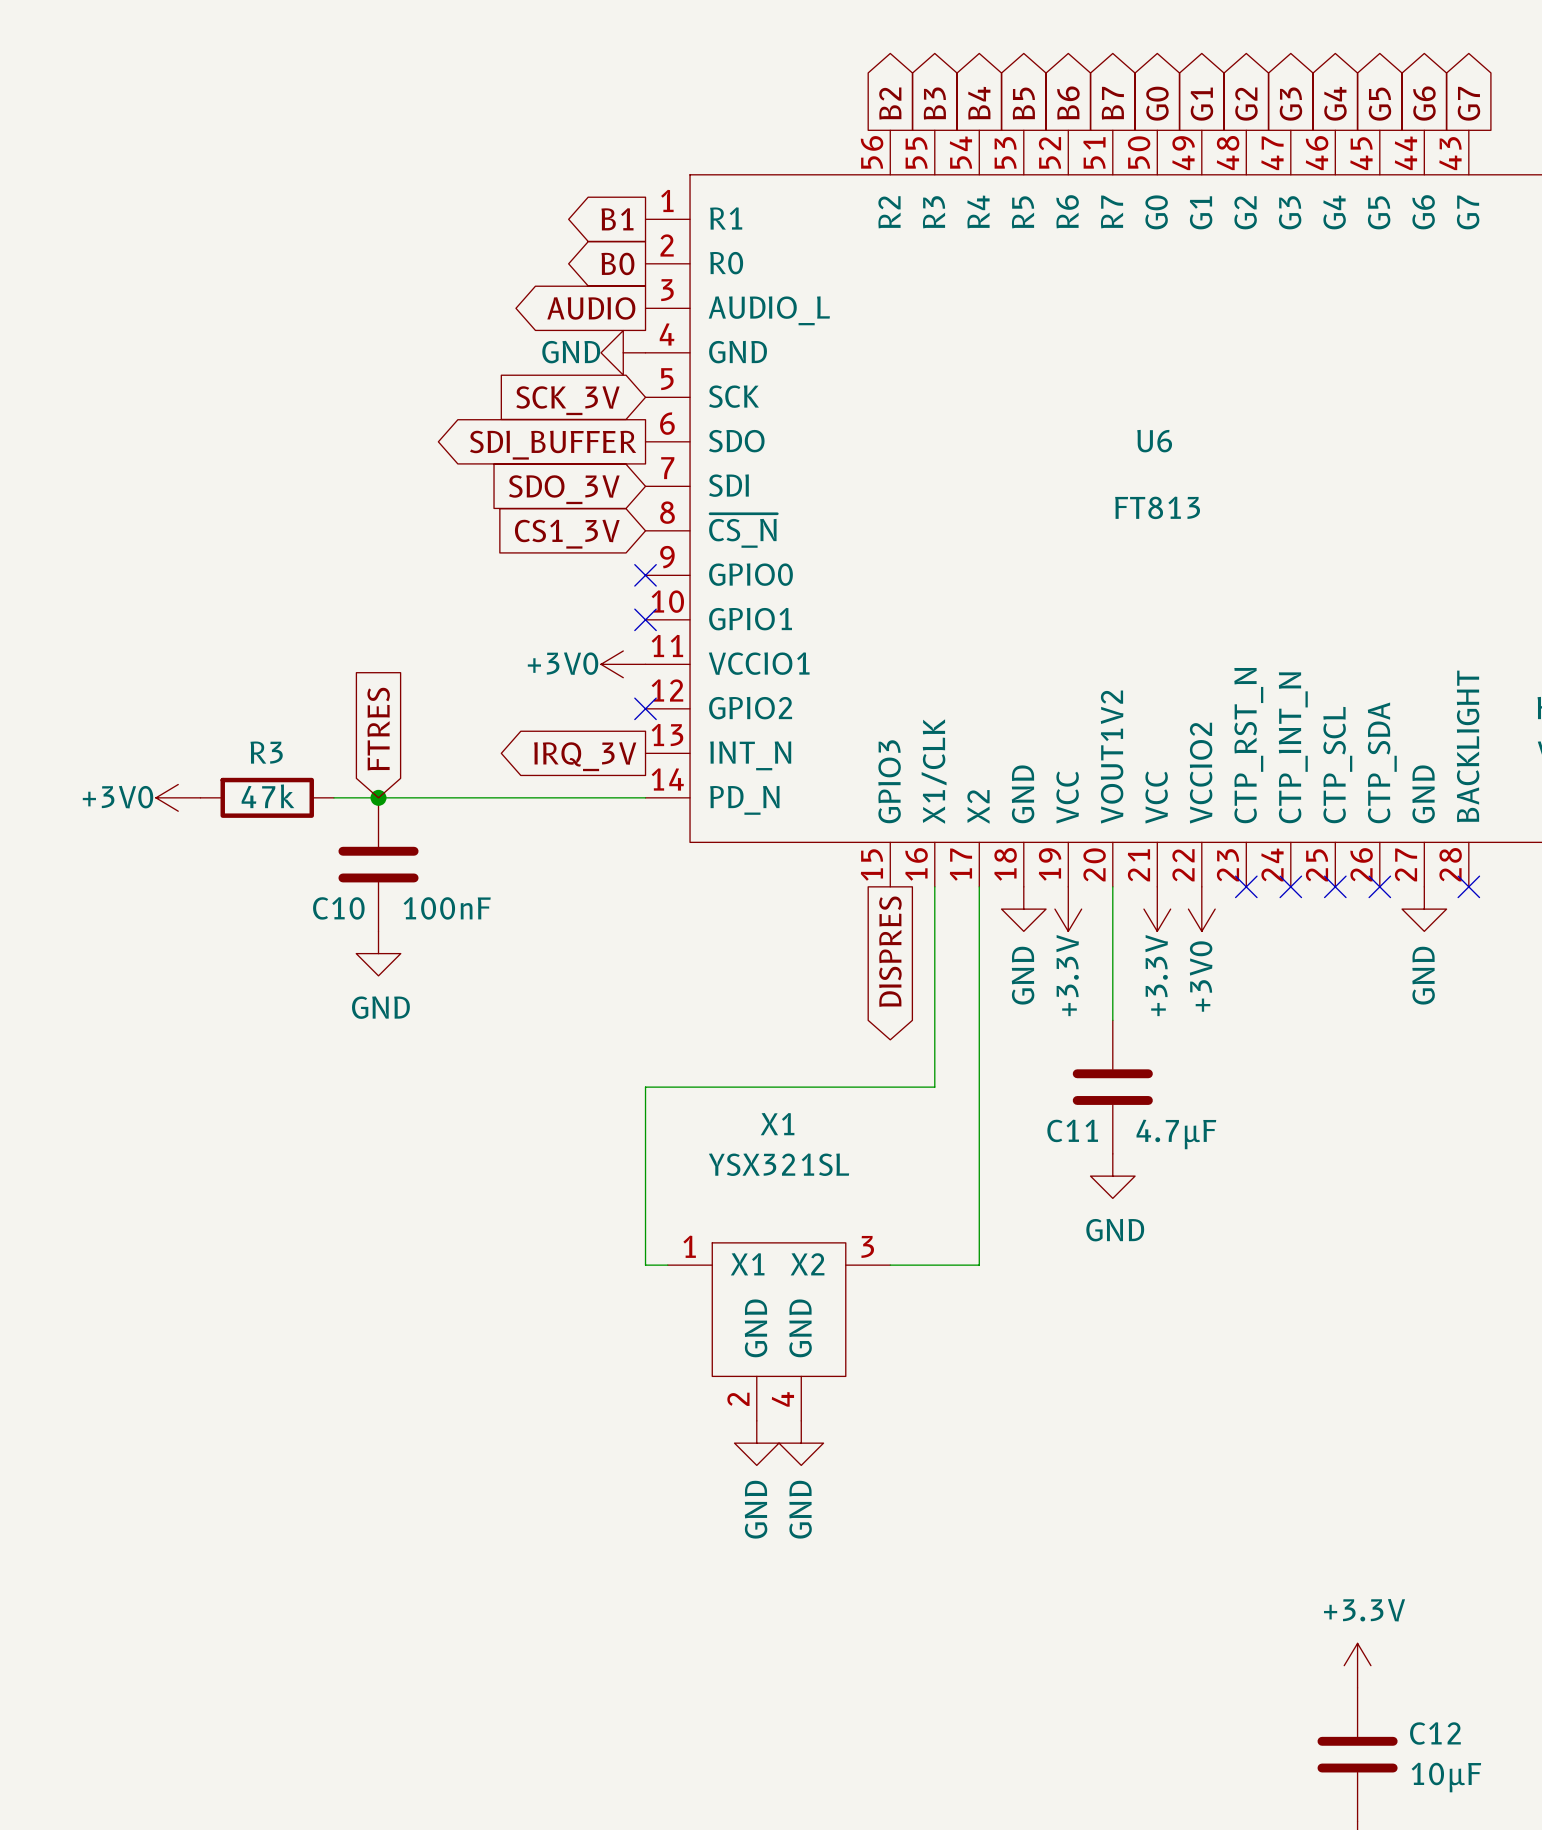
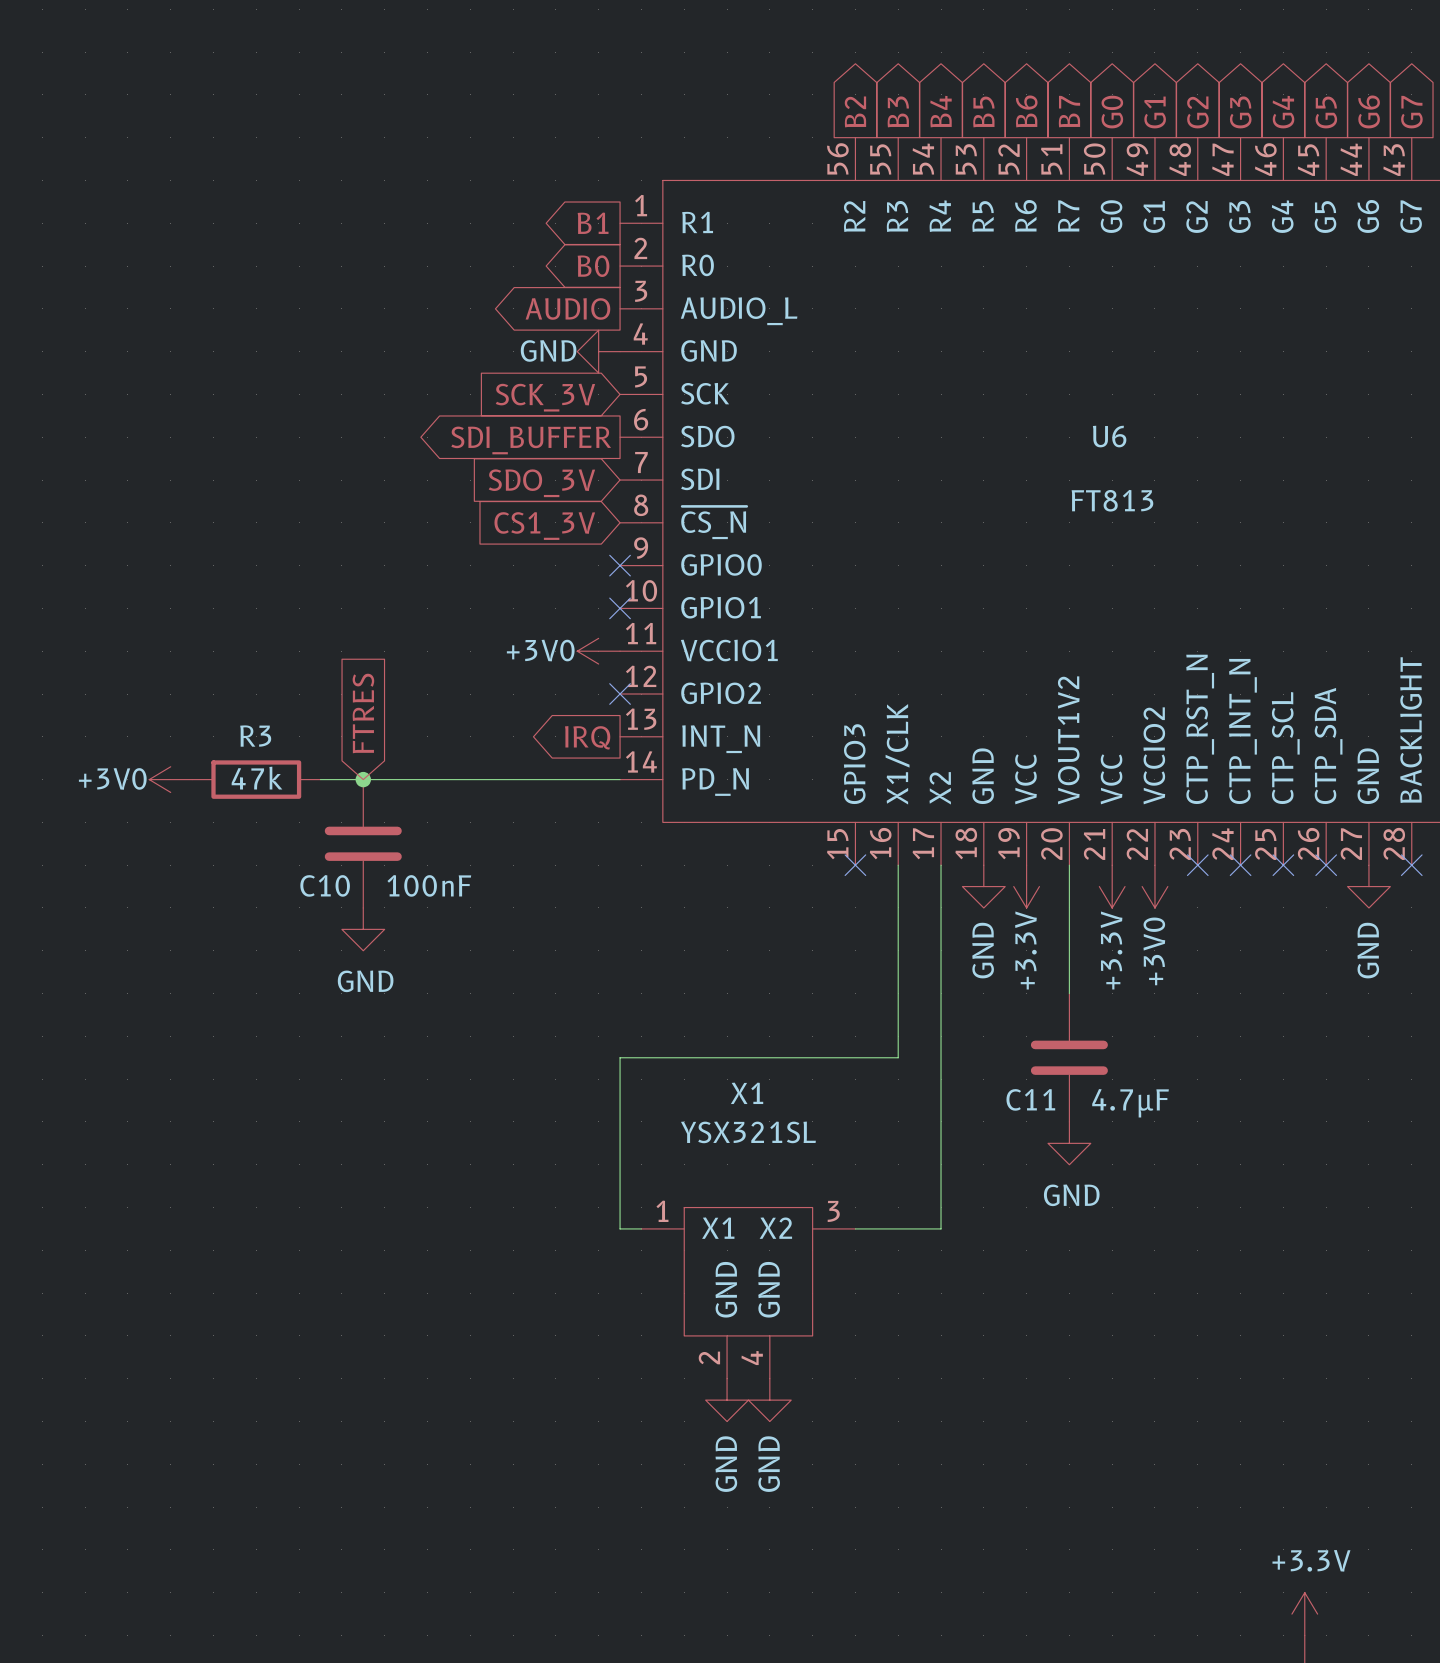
global label: IRQ_3V (585, 756) -> IRQ (587, 737)
no-connect mark: none -> (855, 865)
global label: DISPRES (890, 951) -> none

